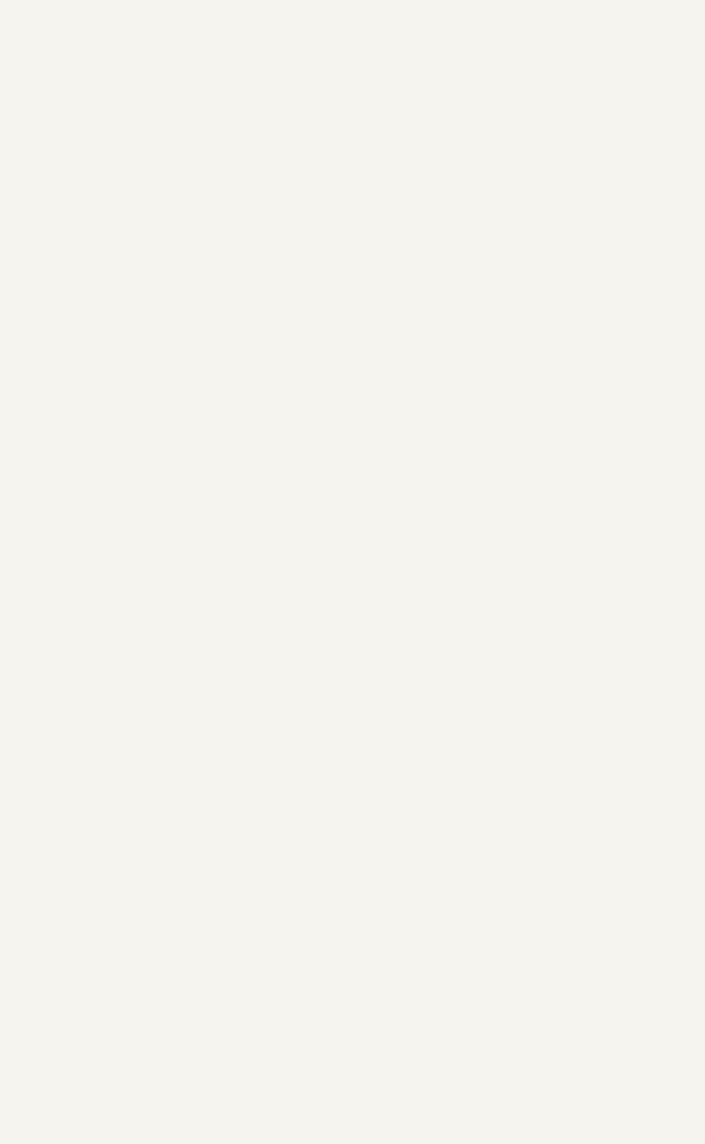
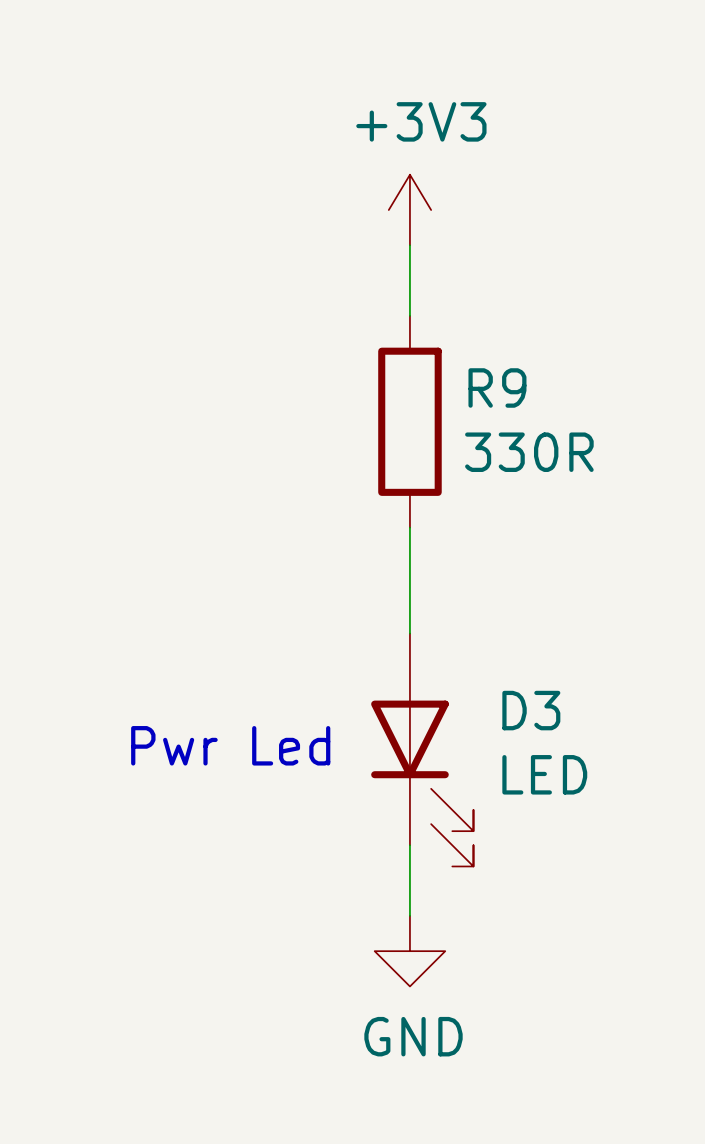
power symbol: none -> +3V3 (409, 210)
wire: none -> (409, 245) (409, 315)
R9: none -> 330R (409, 421)
wire: none -> (409, 527) (409, 633)
text: none -> Pwr Led (230, 745)
D3: none -> LED (422, 750)
wire: none -> (409, 845) (409, 915)
power symbol: none -> GND (409, 951)

